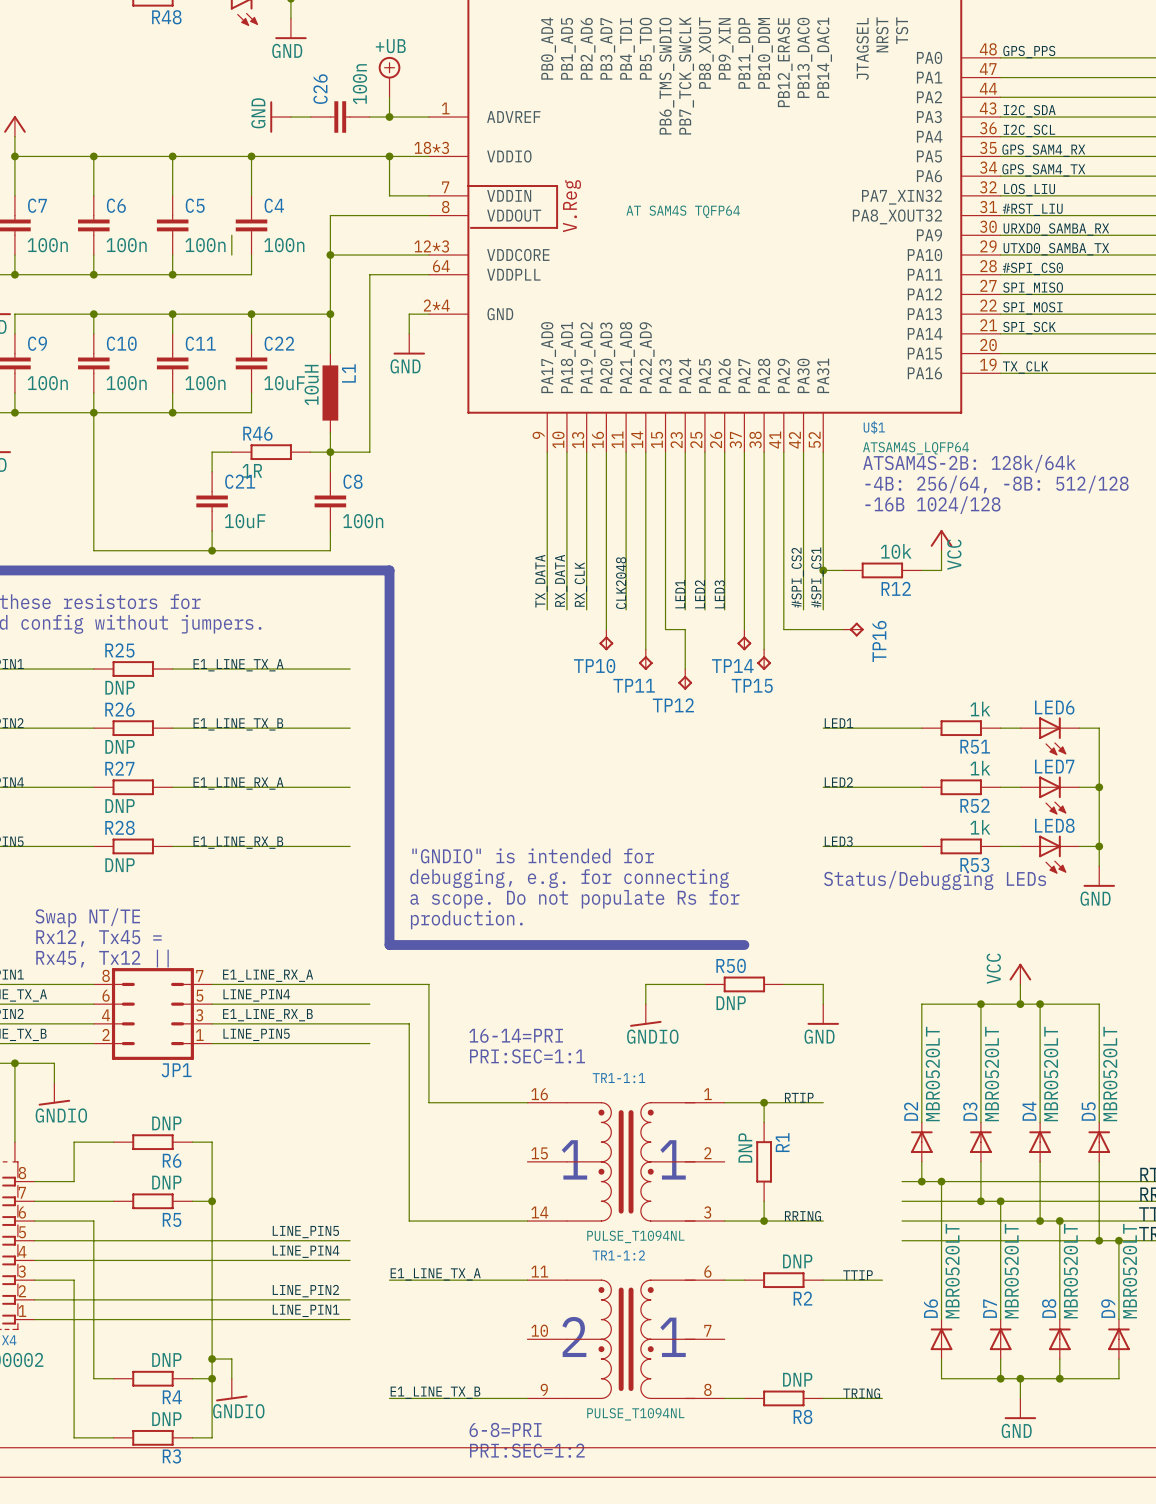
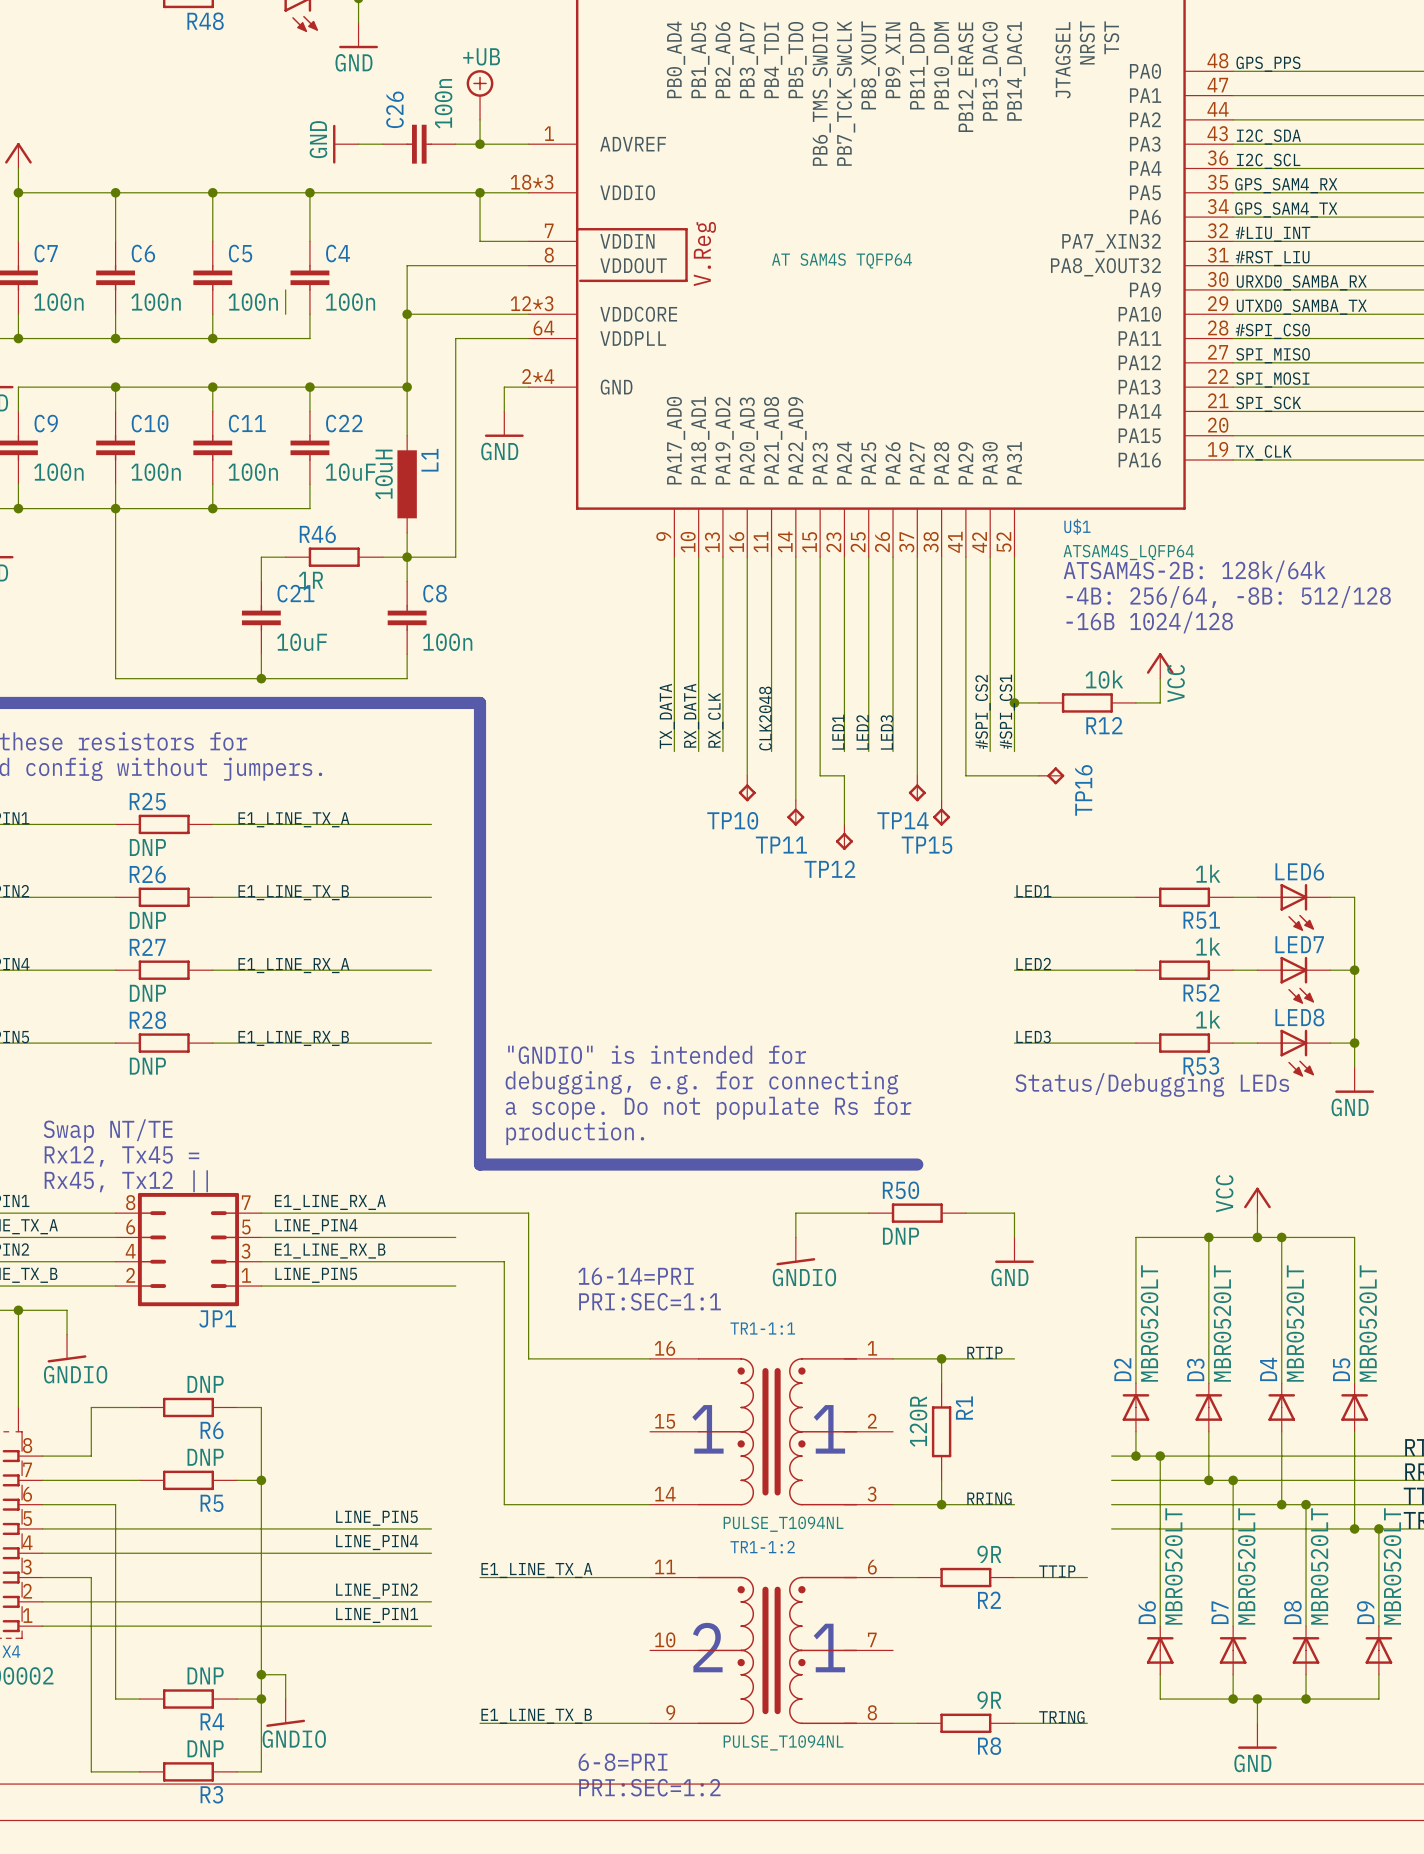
label: LOS_LIU (1029, 190) -> #LIU_INT (1273, 234)
R1 value: DNP (745, 1147) -> 120R (918, 1421)
R2 value: DNP (797, 1261) -> 9R (989, 1554)
R8 value: DNP (797, 1379) -> 9R (989, 1700)

